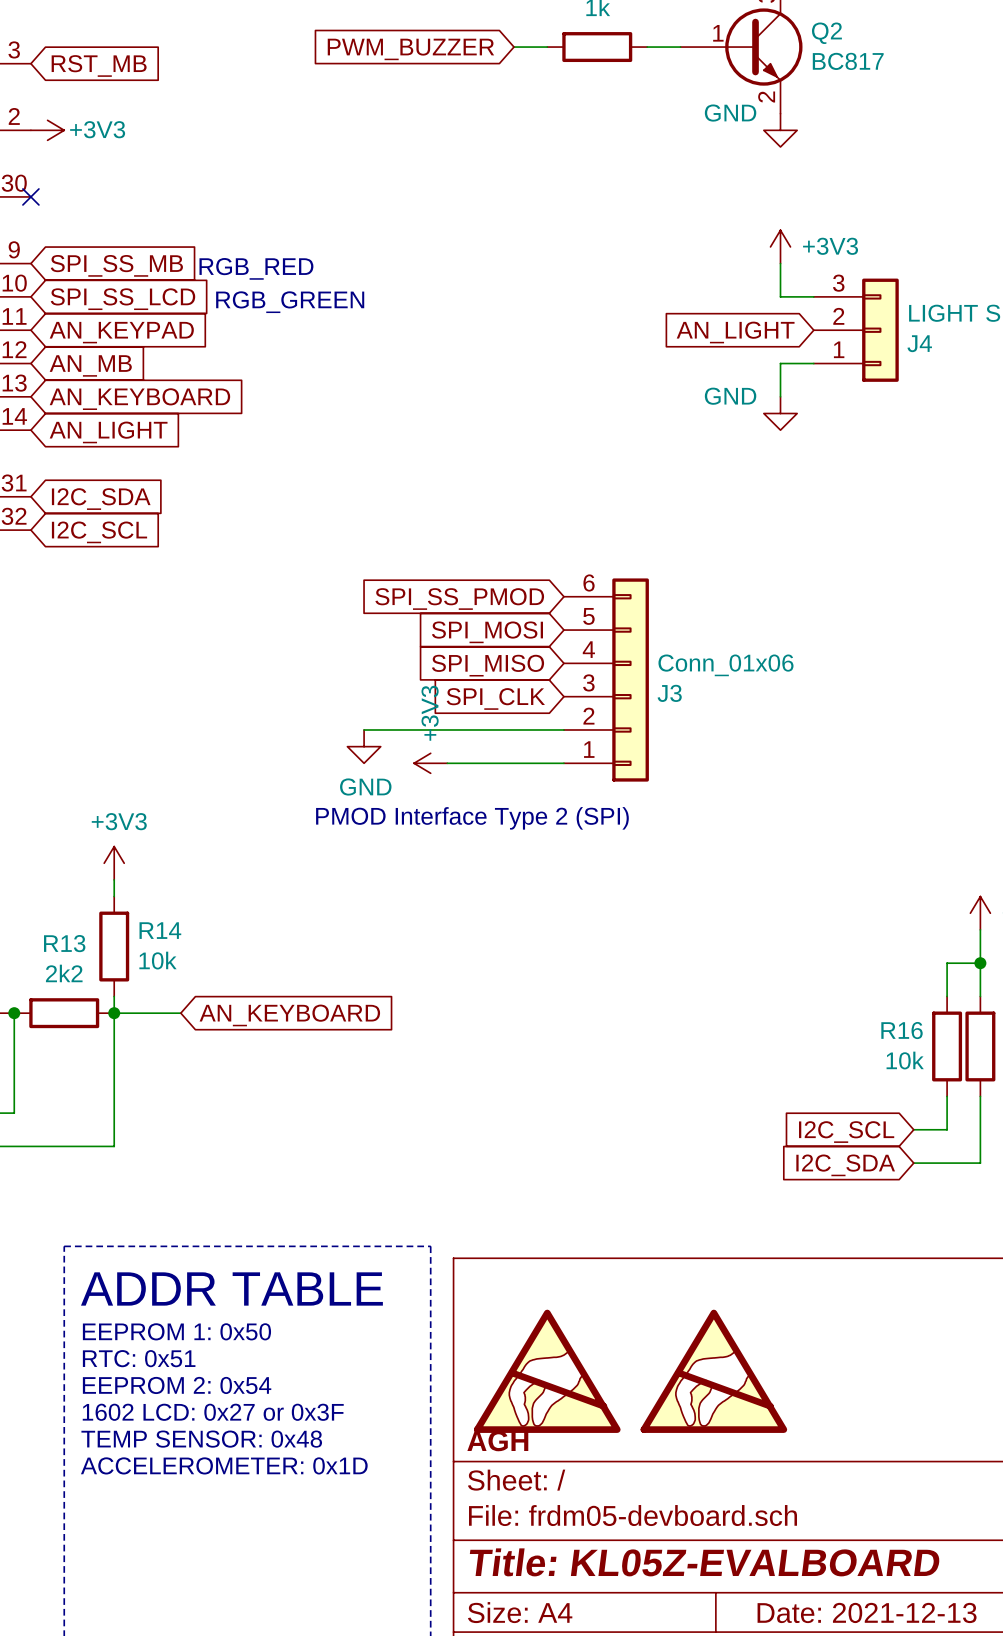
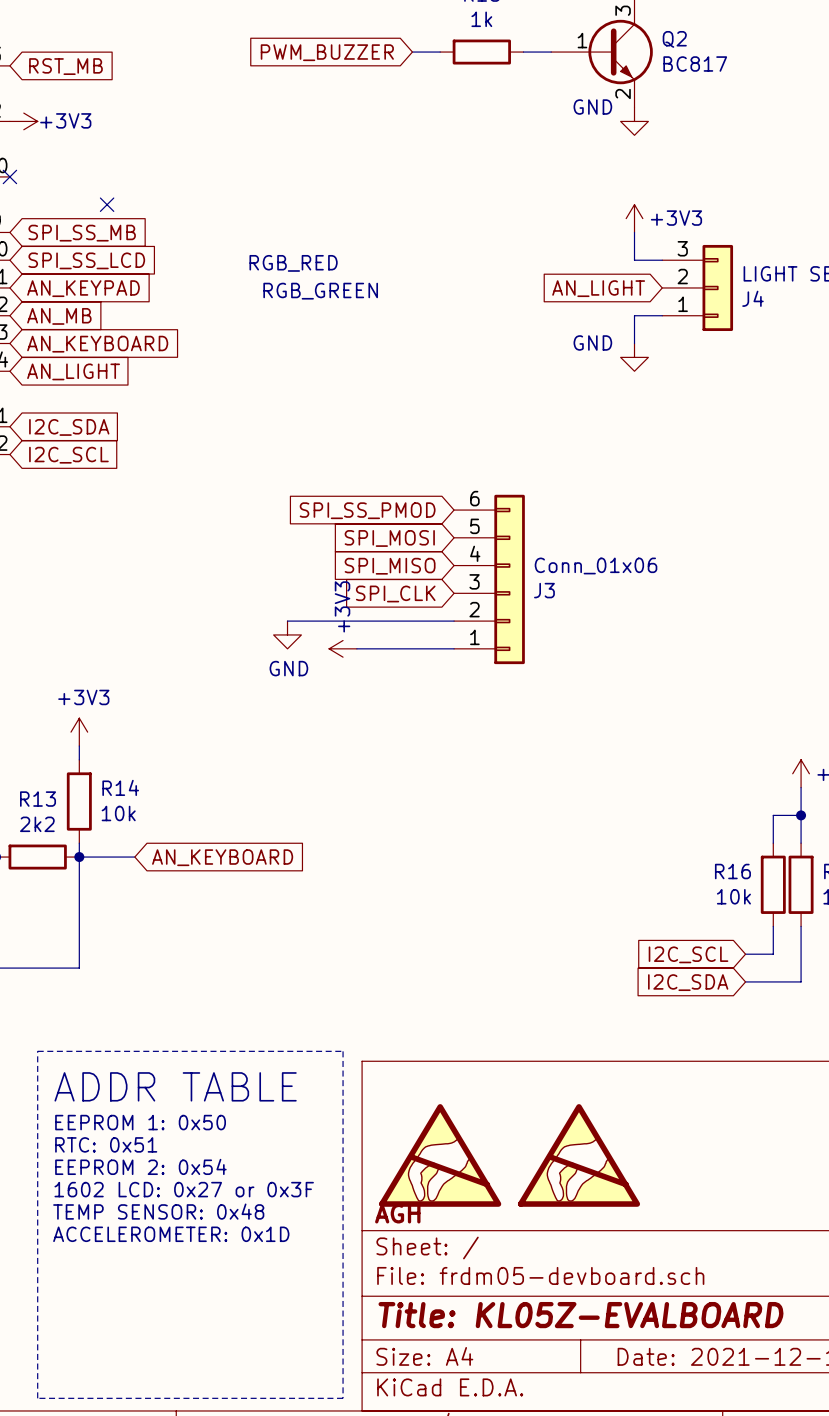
no-connect mark: none -> (107, 204)
text position: RGB_RED (256, 268) -> RGB_RED (293, 263)
text position: RGB_GREEN (290, 302) -> RGB_GREEN (320, 291)
text: PMOD Interface Type 2 (SPI) (472, 818) -> none

